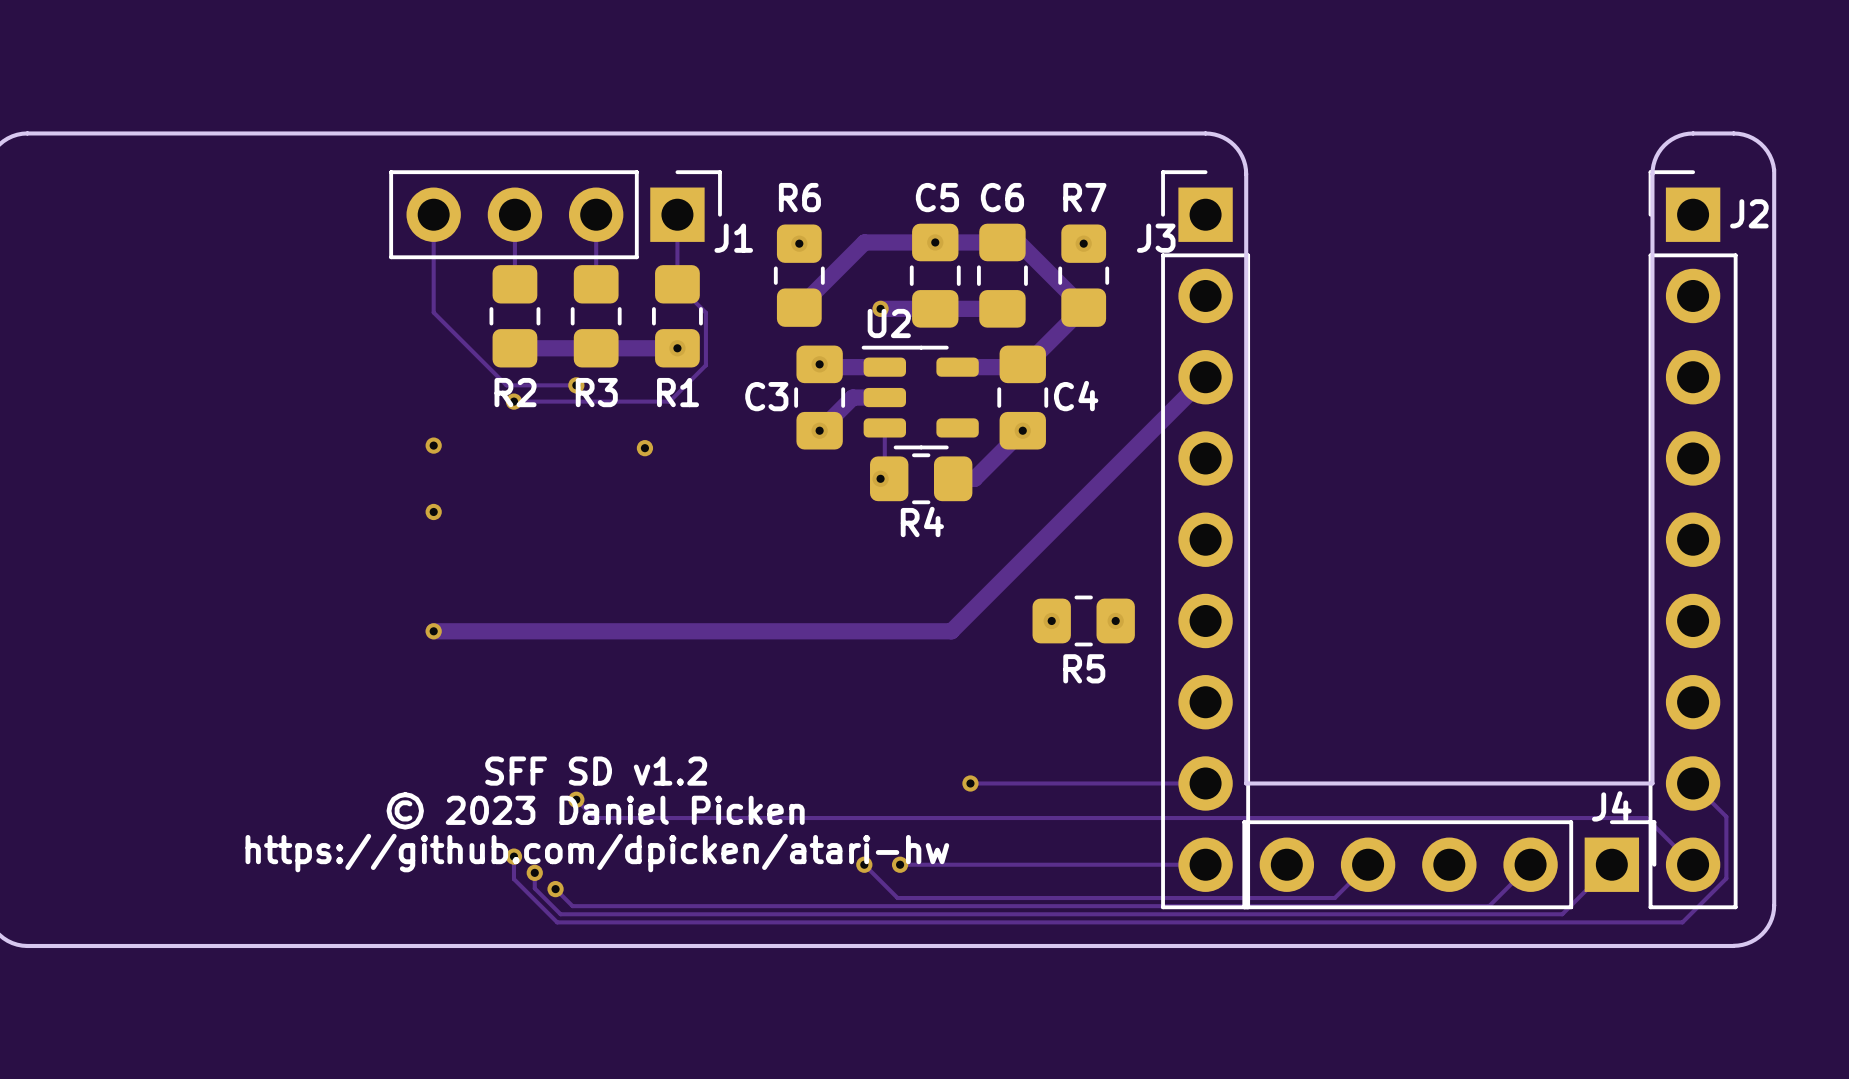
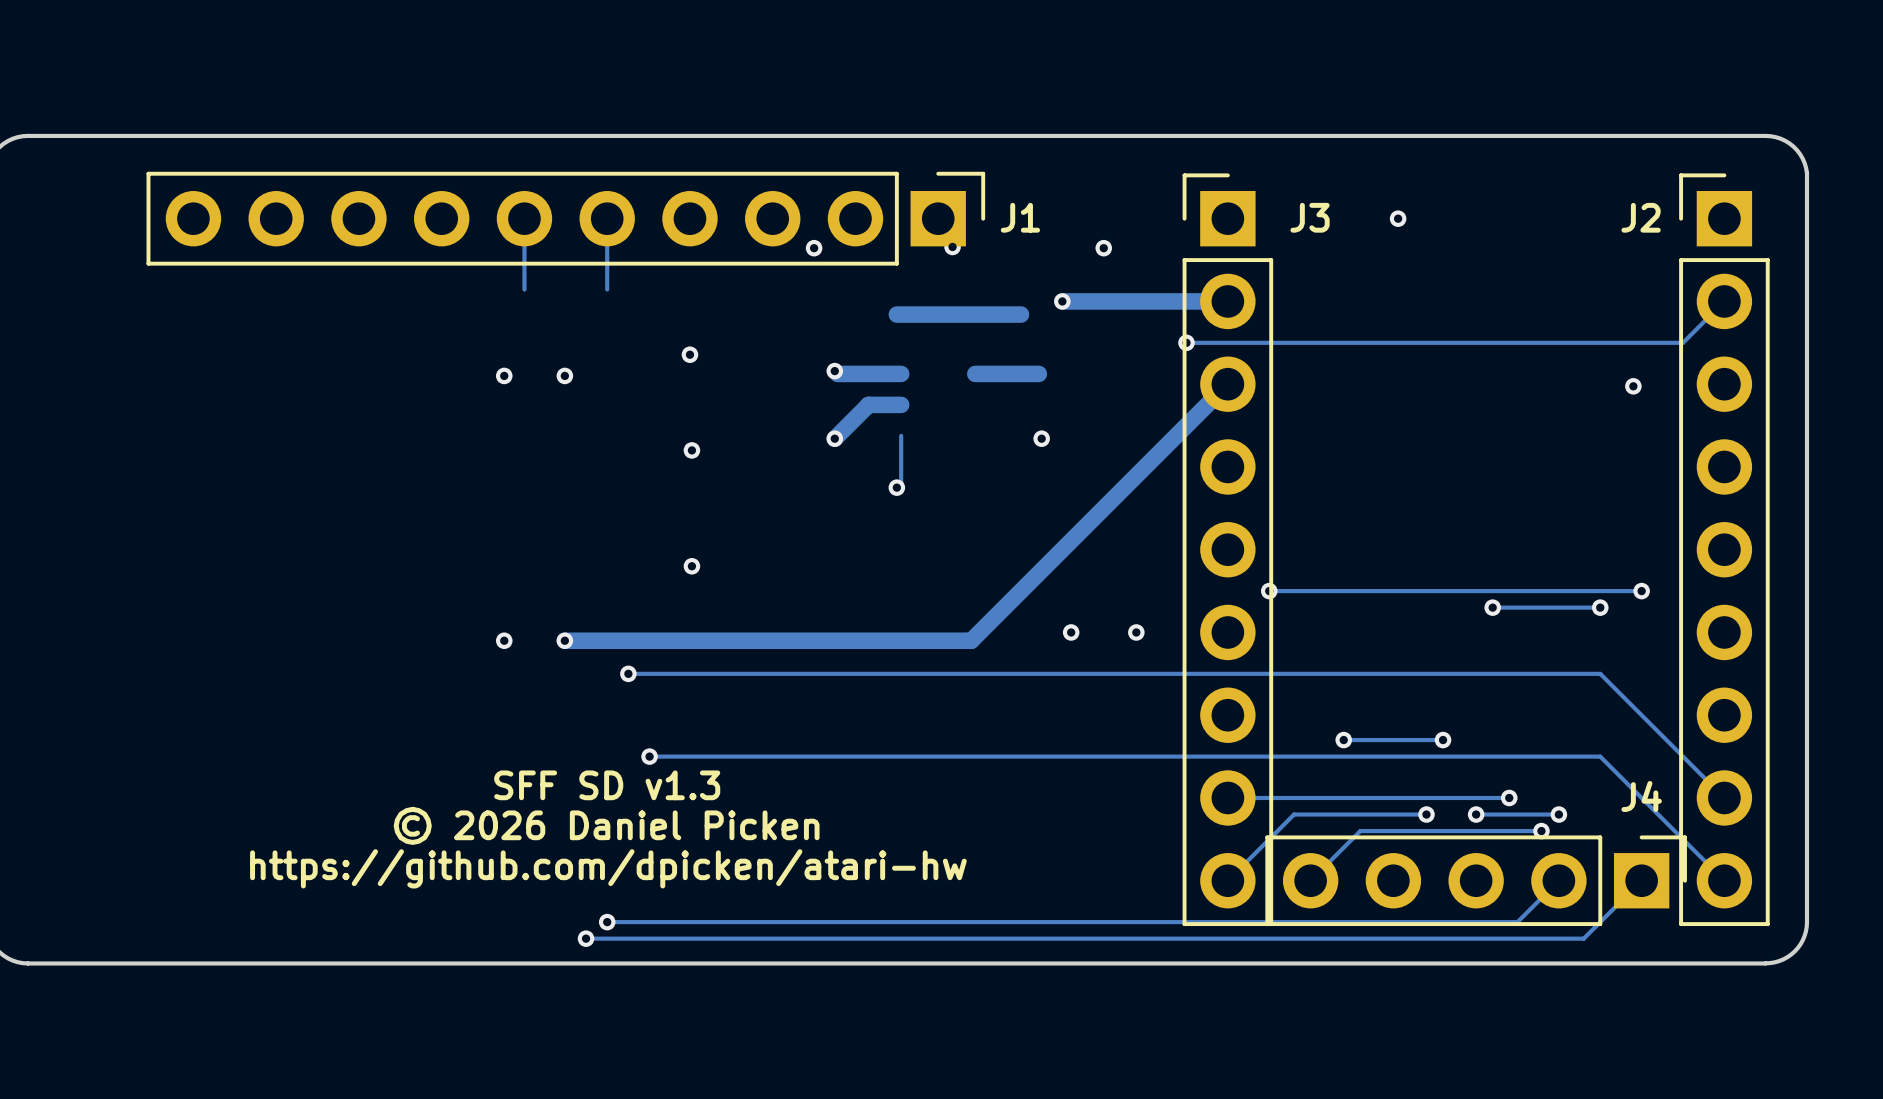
board edge: (1693, 133) (1679, 135) (1667, 142) (1658, 152) (1652, 169) (1652, 783) (1246, 783) (1245, 169) (1242, 156) (1234, 145) (1223, 137) (1205, 133) -> (1724, 135) (1227, 135)
J1 footprint: [389, 170, 722, 260] -> [146, 171, 986, 266]
J2 name position: J2 (1749, 213) -> J2 (1641, 217)
track: (433, 214) (433, 312) (506, 385) (576, 385) -> none
track: (677, 214) (677, 284) (705, 312) (705, 365) (669, 401) (513, 401) -> none
via: none -> (1398, 218)
J1 name position: J1 (733, 238) -> J1 (1020, 217)
J3 name position: J3 (1156, 238) -> J3 (1310, 217)
R6: (799, 275) -> none
C5: (935, 275) -> none
C6: (1002, 275) -> none
R7: (1083, 275) -> none
via: none -> (1062, 301)
track: none -> (1724, 301) (1683, 342) (1186, 342)
track: (799, 307) (864, 242) (1018, 242) (1083, 307) (1027, 364) -> none
via: (880, 308) -> none
R2: (514, 316) -> none
R3: (596, 316) -> none
R1: (677, 316) -> none
via: none -> (1186, 342)
track: (677, 348) (514, 348) -> (1227, 301) (1062, 301)
via: none -> (504, 375)
via: none -> (564, 375)
via: none -> (1633, 386)
via: (576, 385) -> none
C3: (819, 397) -> none
U2: (920, 397) -> none
C4: (1022, 397) -> none
via: (513, 401) -> none
track: (1022, 430) (974, 478) (953, 478) -> none
via: (433, 445) -> none
via position: (644, 448) -> (691, 450)
R4: (921, 478) -> none
via: (433, 511) -> none
via: none -> (691, 566)
via: none -> (1269, 591)
track: none -> (1641, 591) (1269, 591)
via: none -> (1641, 591)
via: none -> (1492, 607)
track: none -> (1600, 607) (1492, 607)
via: none -> (1600, 607)
R5: (1083, 620) -> none
via: none -> (504, 640)
via: none -> (564, 640)
track: (953, 629) (951, 631) (433, 631) -> (971, 640) (564, 640)
via: (433, 631) -> none
via: none -> (628, 673)
via: none -> (1343, 740)
track: none -> (1443, 740) (1343, 740)
via: none -> (1443, 740)
via: none -> (649, 756)
text: SFF SD v1.2 (596, 771) -> SFF SD v1.3 (607, 785)
via: (970, 783) -> none
track: (1205, 783) (970, 783) -> (1227, 797) (1509, 797)
via: none -> (1509, 797)
track: (1693, 783) (1726, 816) (1726, 878) (1682, 922) (557, 922) (513, 879) (513, 856) -> (1724, 797) (1600, 673) (628, 673)
track: (576, 799) (594, 818) (1646, 818) -> (649, 756) (1600, 756) (1676, 833)
via: (576, 799) -> none
via: none -> (1426, 814)
via: none -> (1476, 814)
track: none -> (1558, 814) (1476, 814)
via: none -> (1558, 814)
J4 name position: J4 (1611, 806) -> J4 (1641, 796)
text: © 2023 Daniel Picken (595, 810) -> © 2026 Daniel Picken (606, 825)
track: none -> (1541, 831) (1360, 831) (1310, 880)
via: none -> (1541, 831)
via: (513, 856) -> none
via: (864, 864) -> none
via: (900, 864) -> none
track: (1205, 864) (900, 864) -> (1227, 880) (1294, 814) (1426, 814)
track: (1368, 864) (1334, 898) (897, 898) (864, 864) -> none
track: (534, 872) (534, 888) (560, 914) (1562, 914) -> (586, 938) (1583, 938) (1591, 931)
via: (534, 872) -> none
track: (555, 889) (572, 906) (1489, 905) -> (607, 922) (1517, 922)
via: (555, 889) -> none
via: none -> (607, 922)
via: none -> (586, 938)

